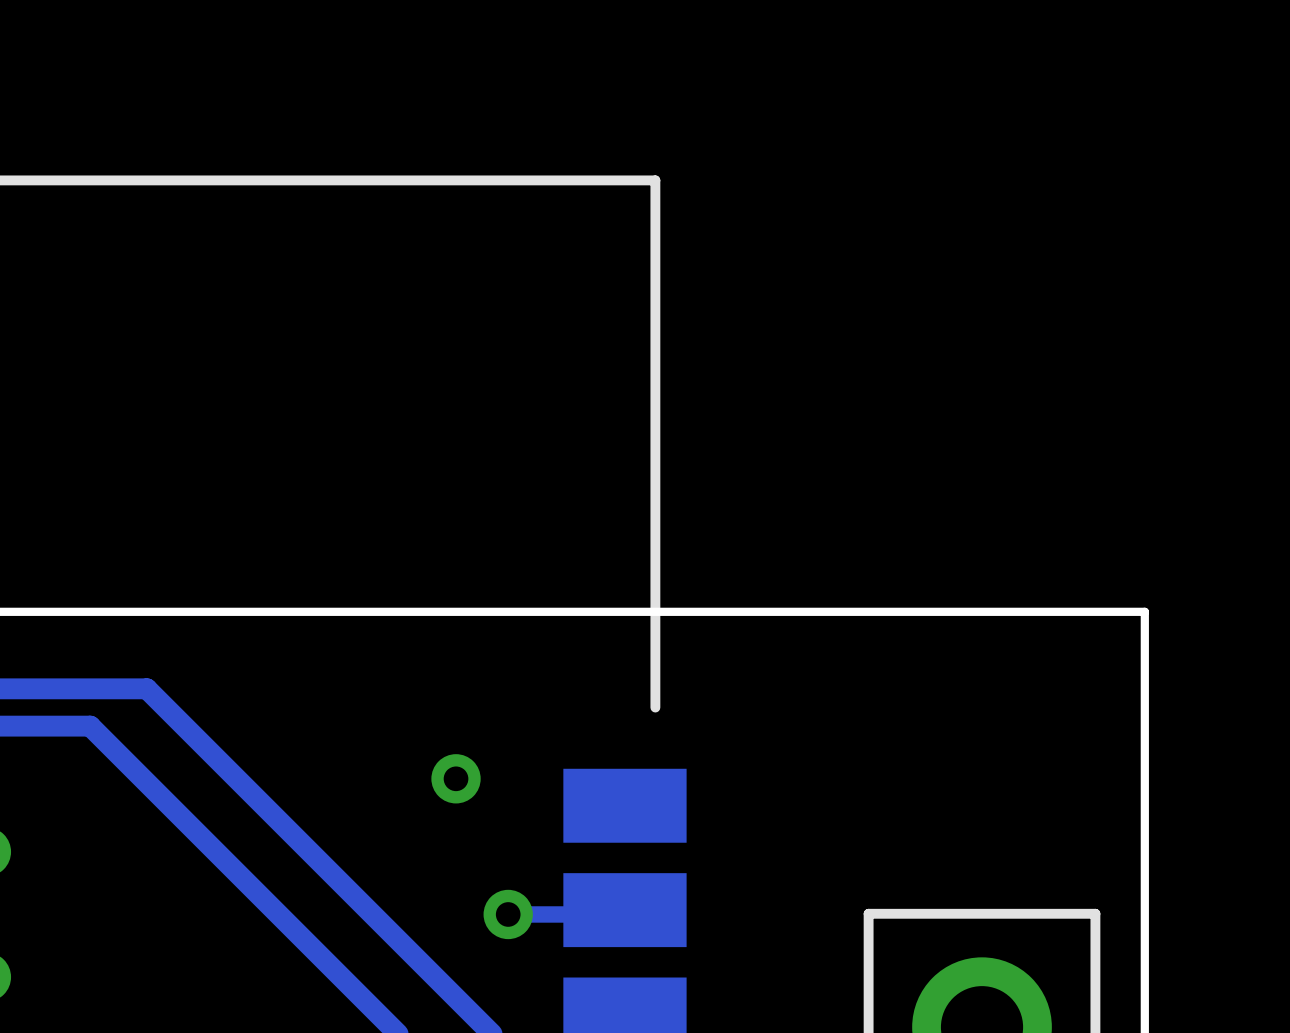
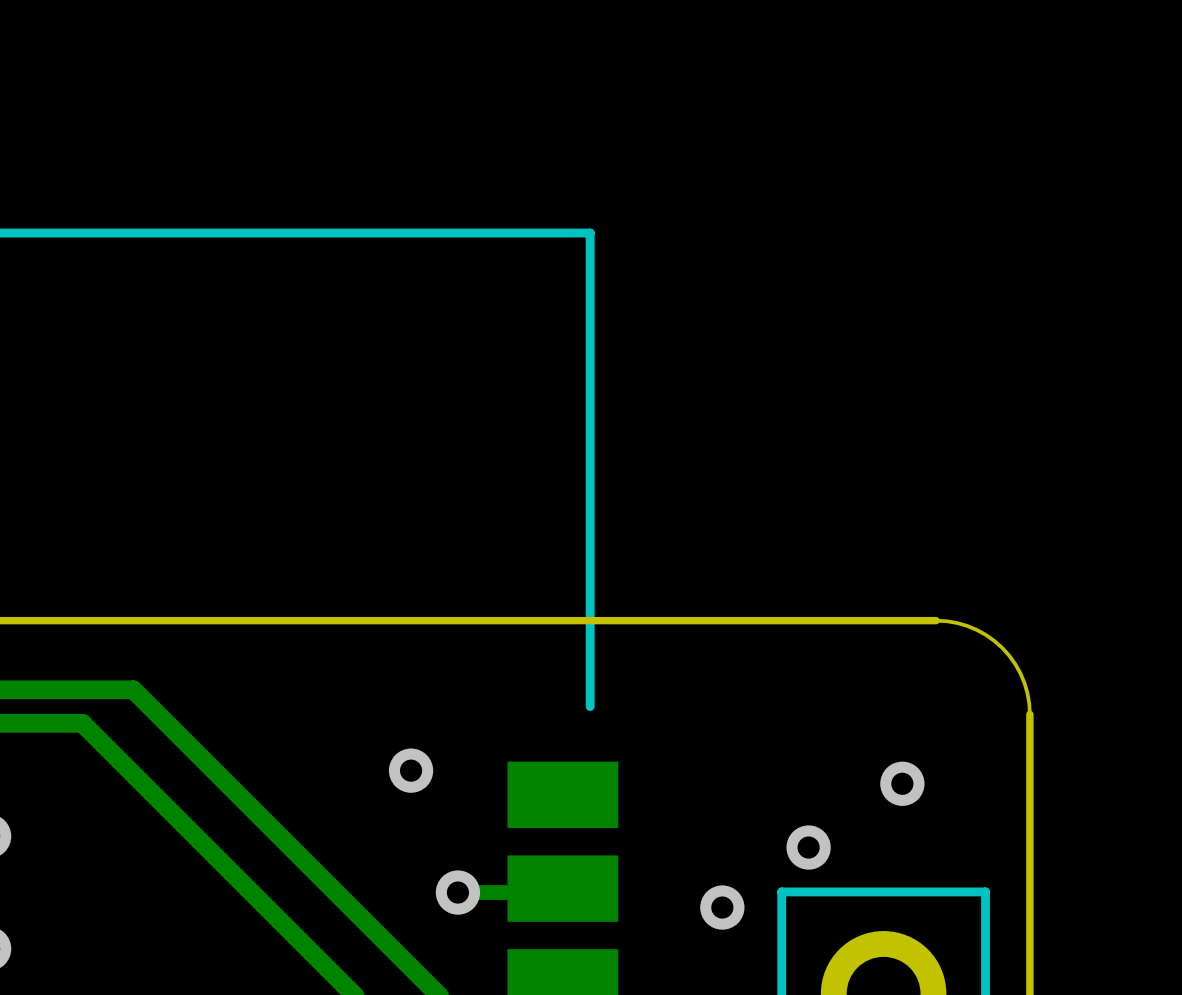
board edge: (1040, 611) (1144, 611) (1144, 716) -> (936, 620) (956, 622) (976, 629) (1002, 648) (1015, 664) (1024, 683) (1029, 714)
via: none -> (902, 783)
via: none -> (808, 847)
via: none -> (722, 907)

